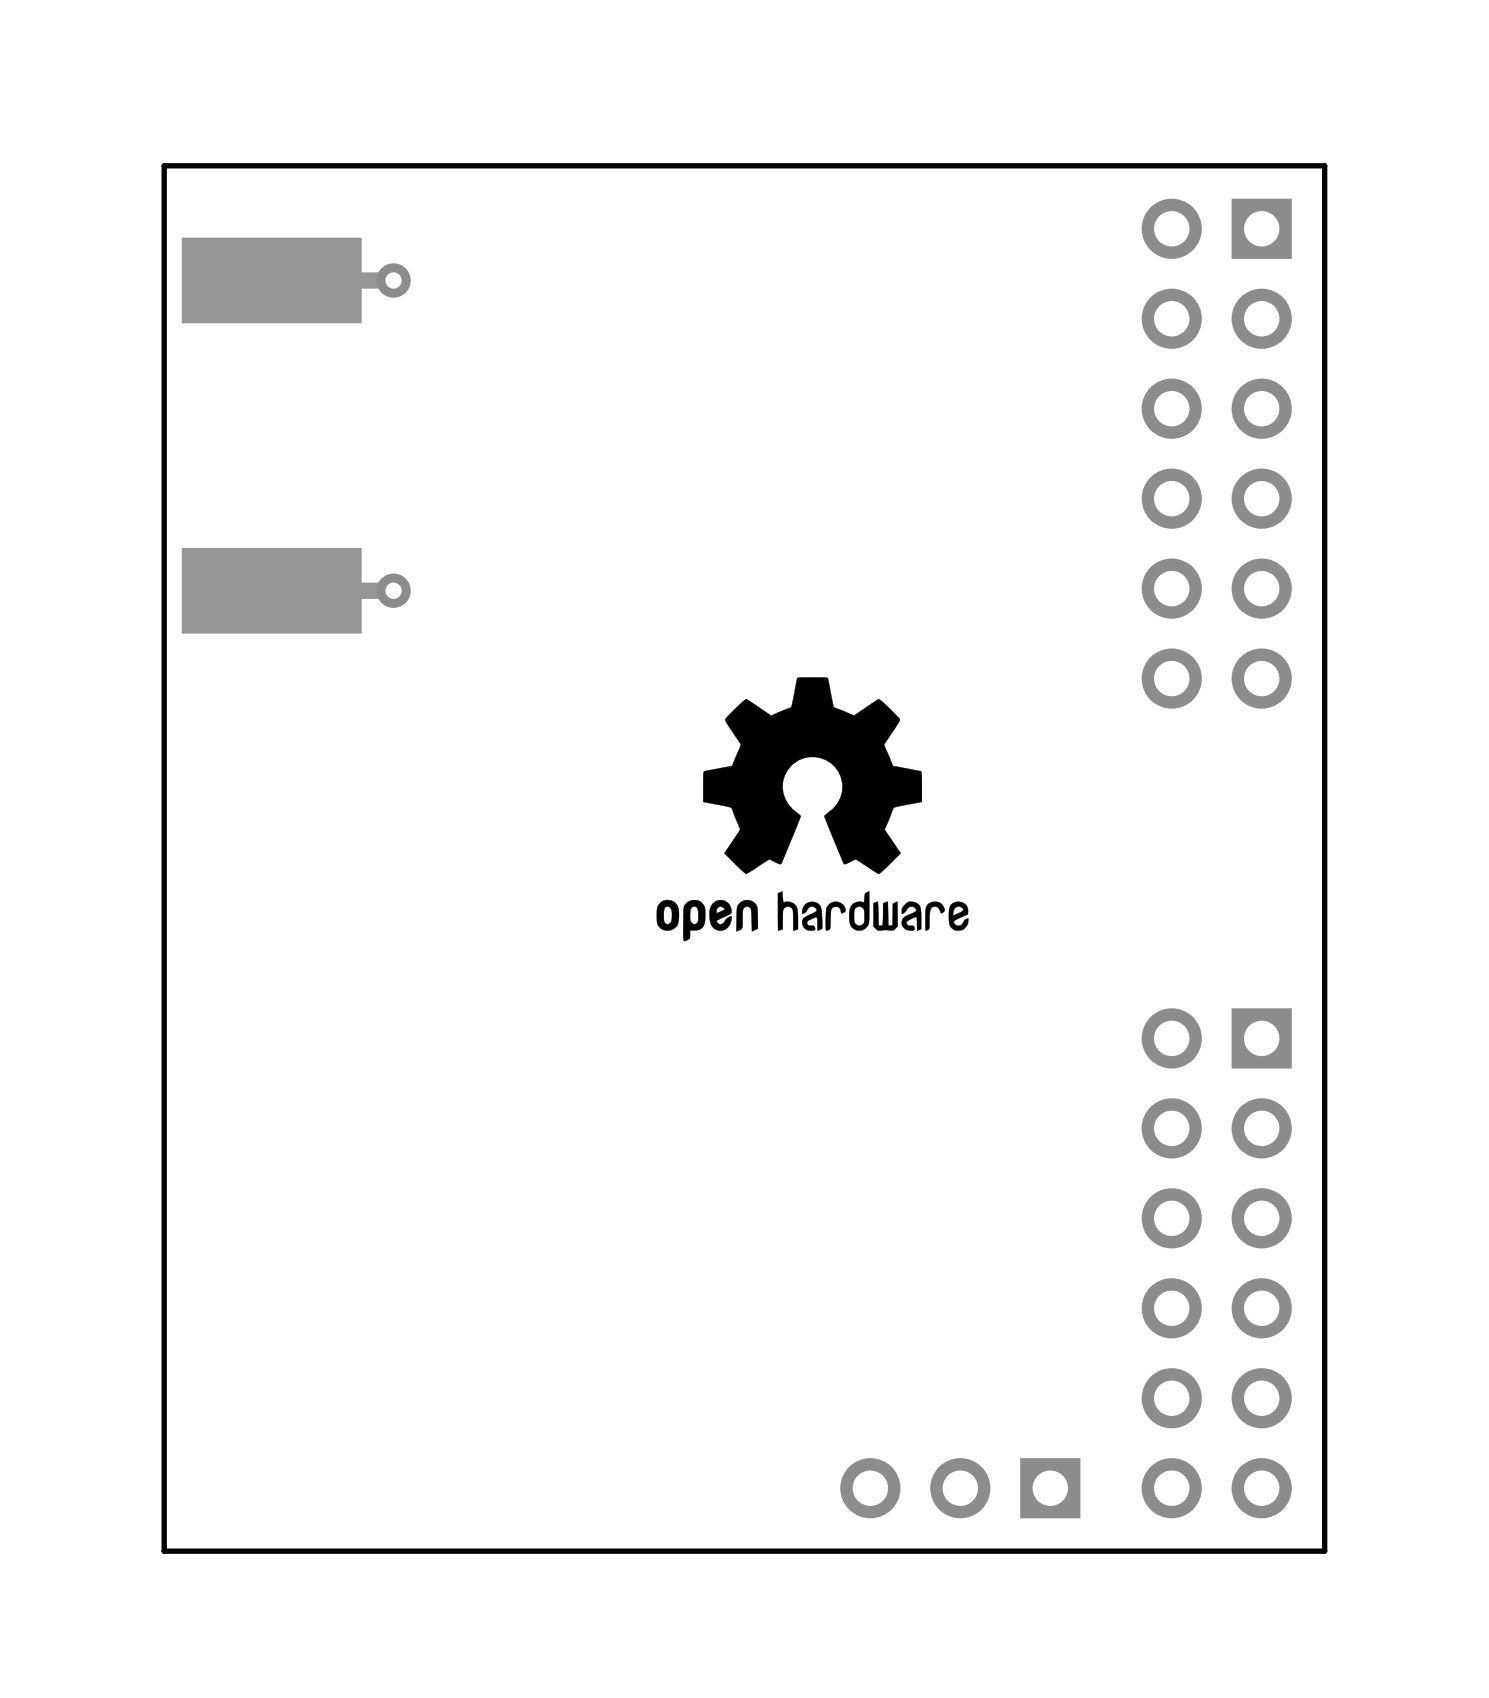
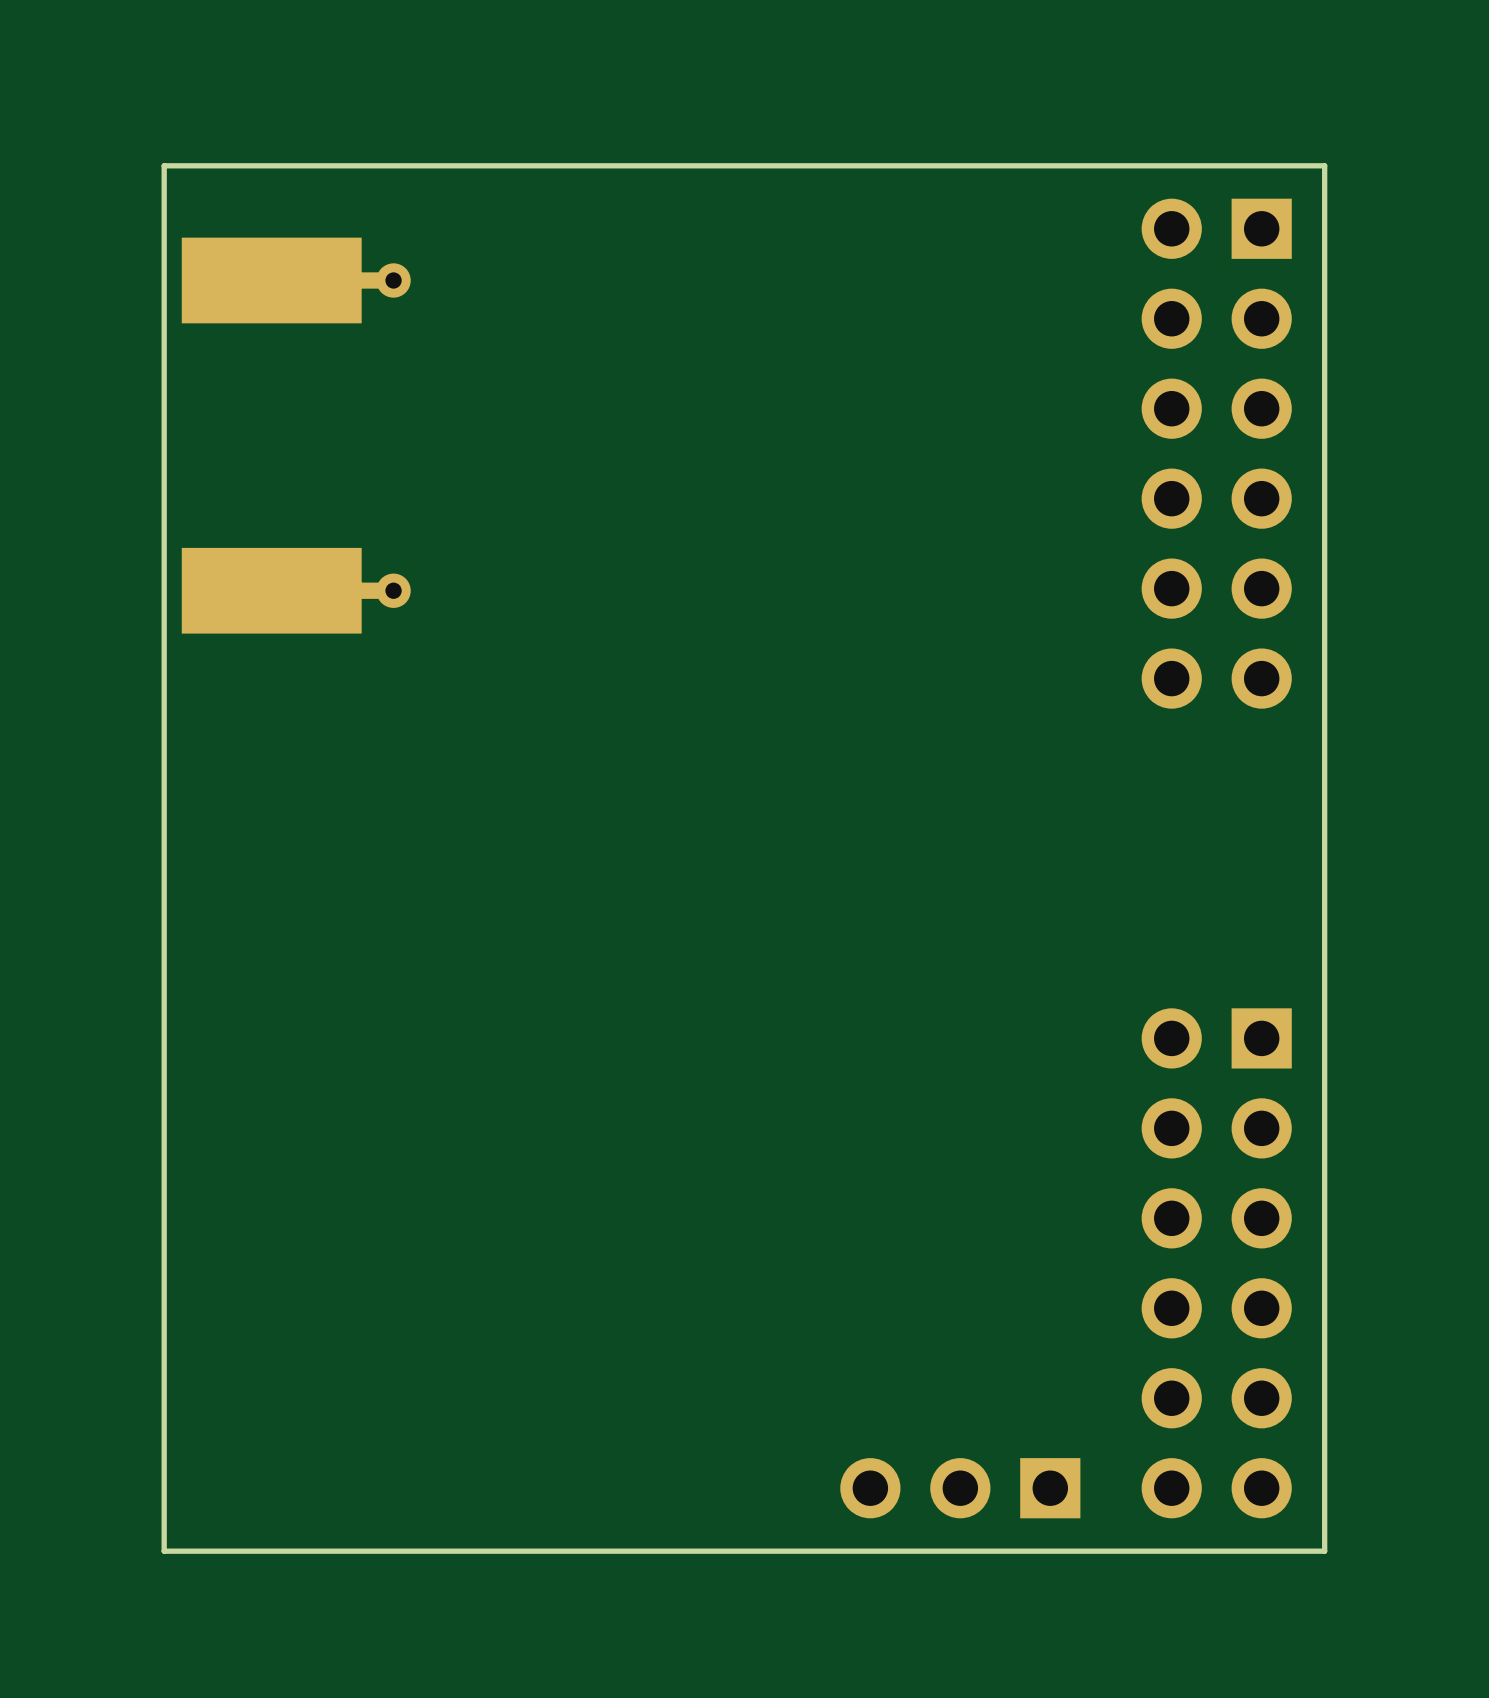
drawing: [656, 677, 969, 942] -> none

